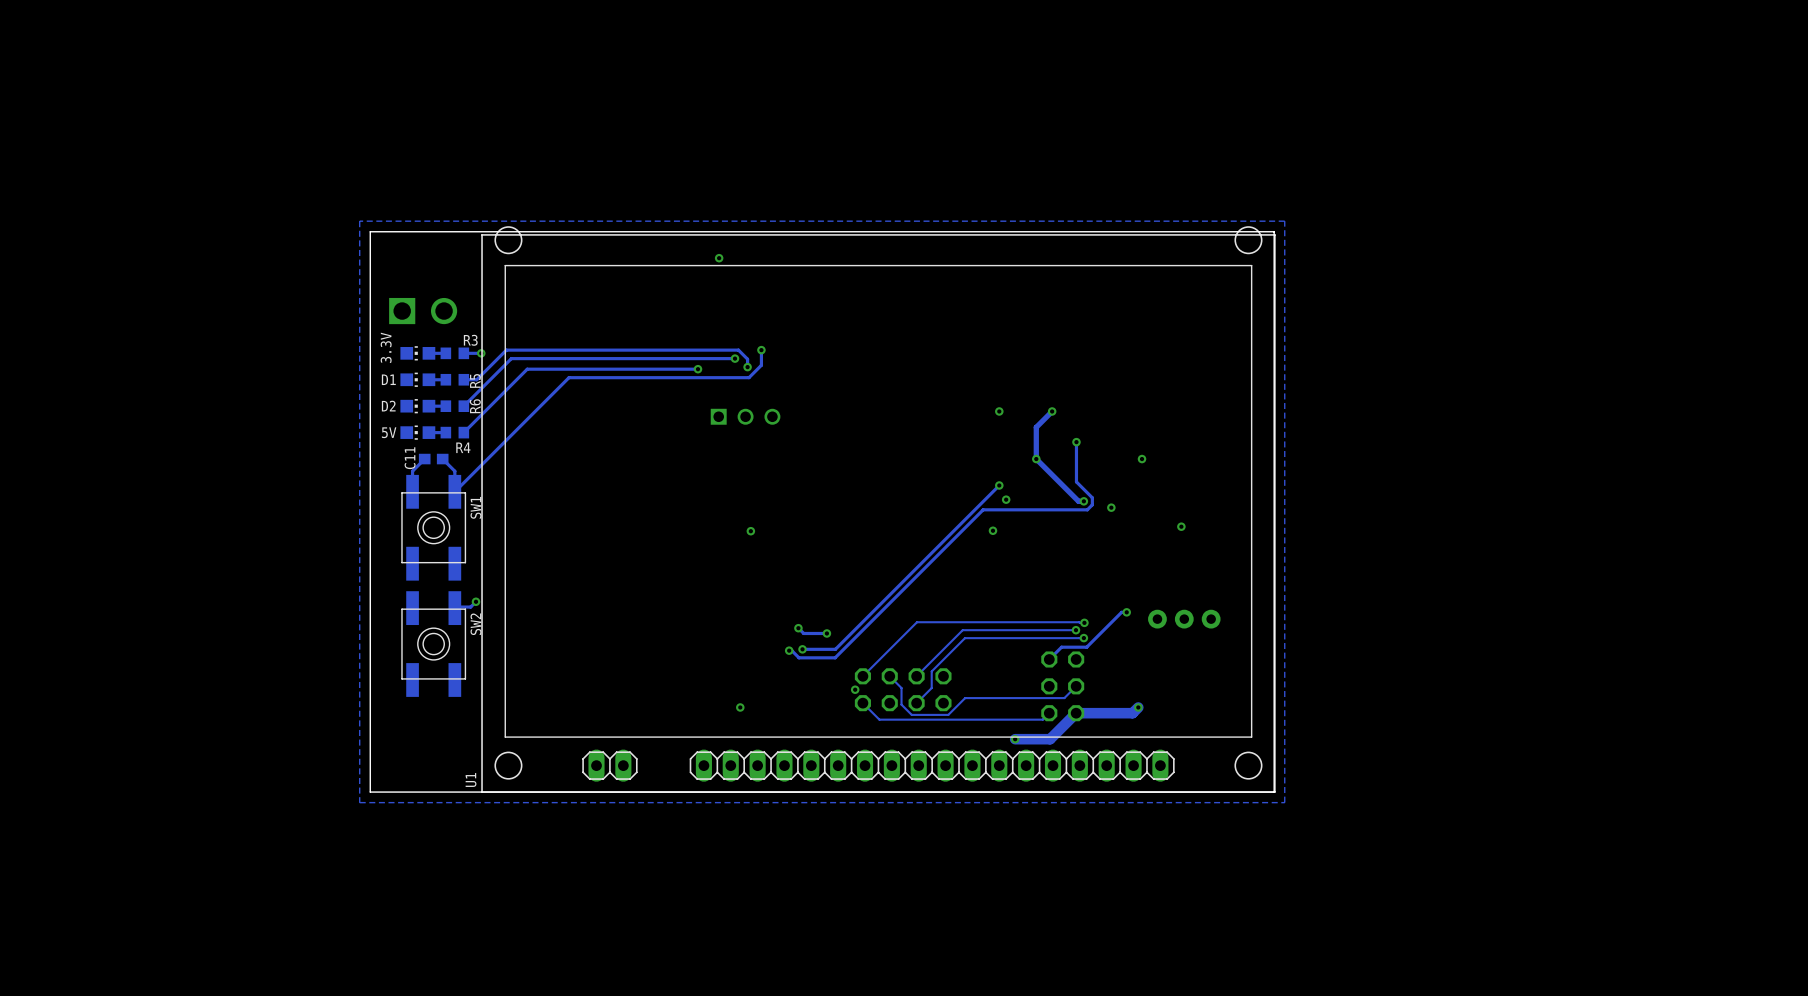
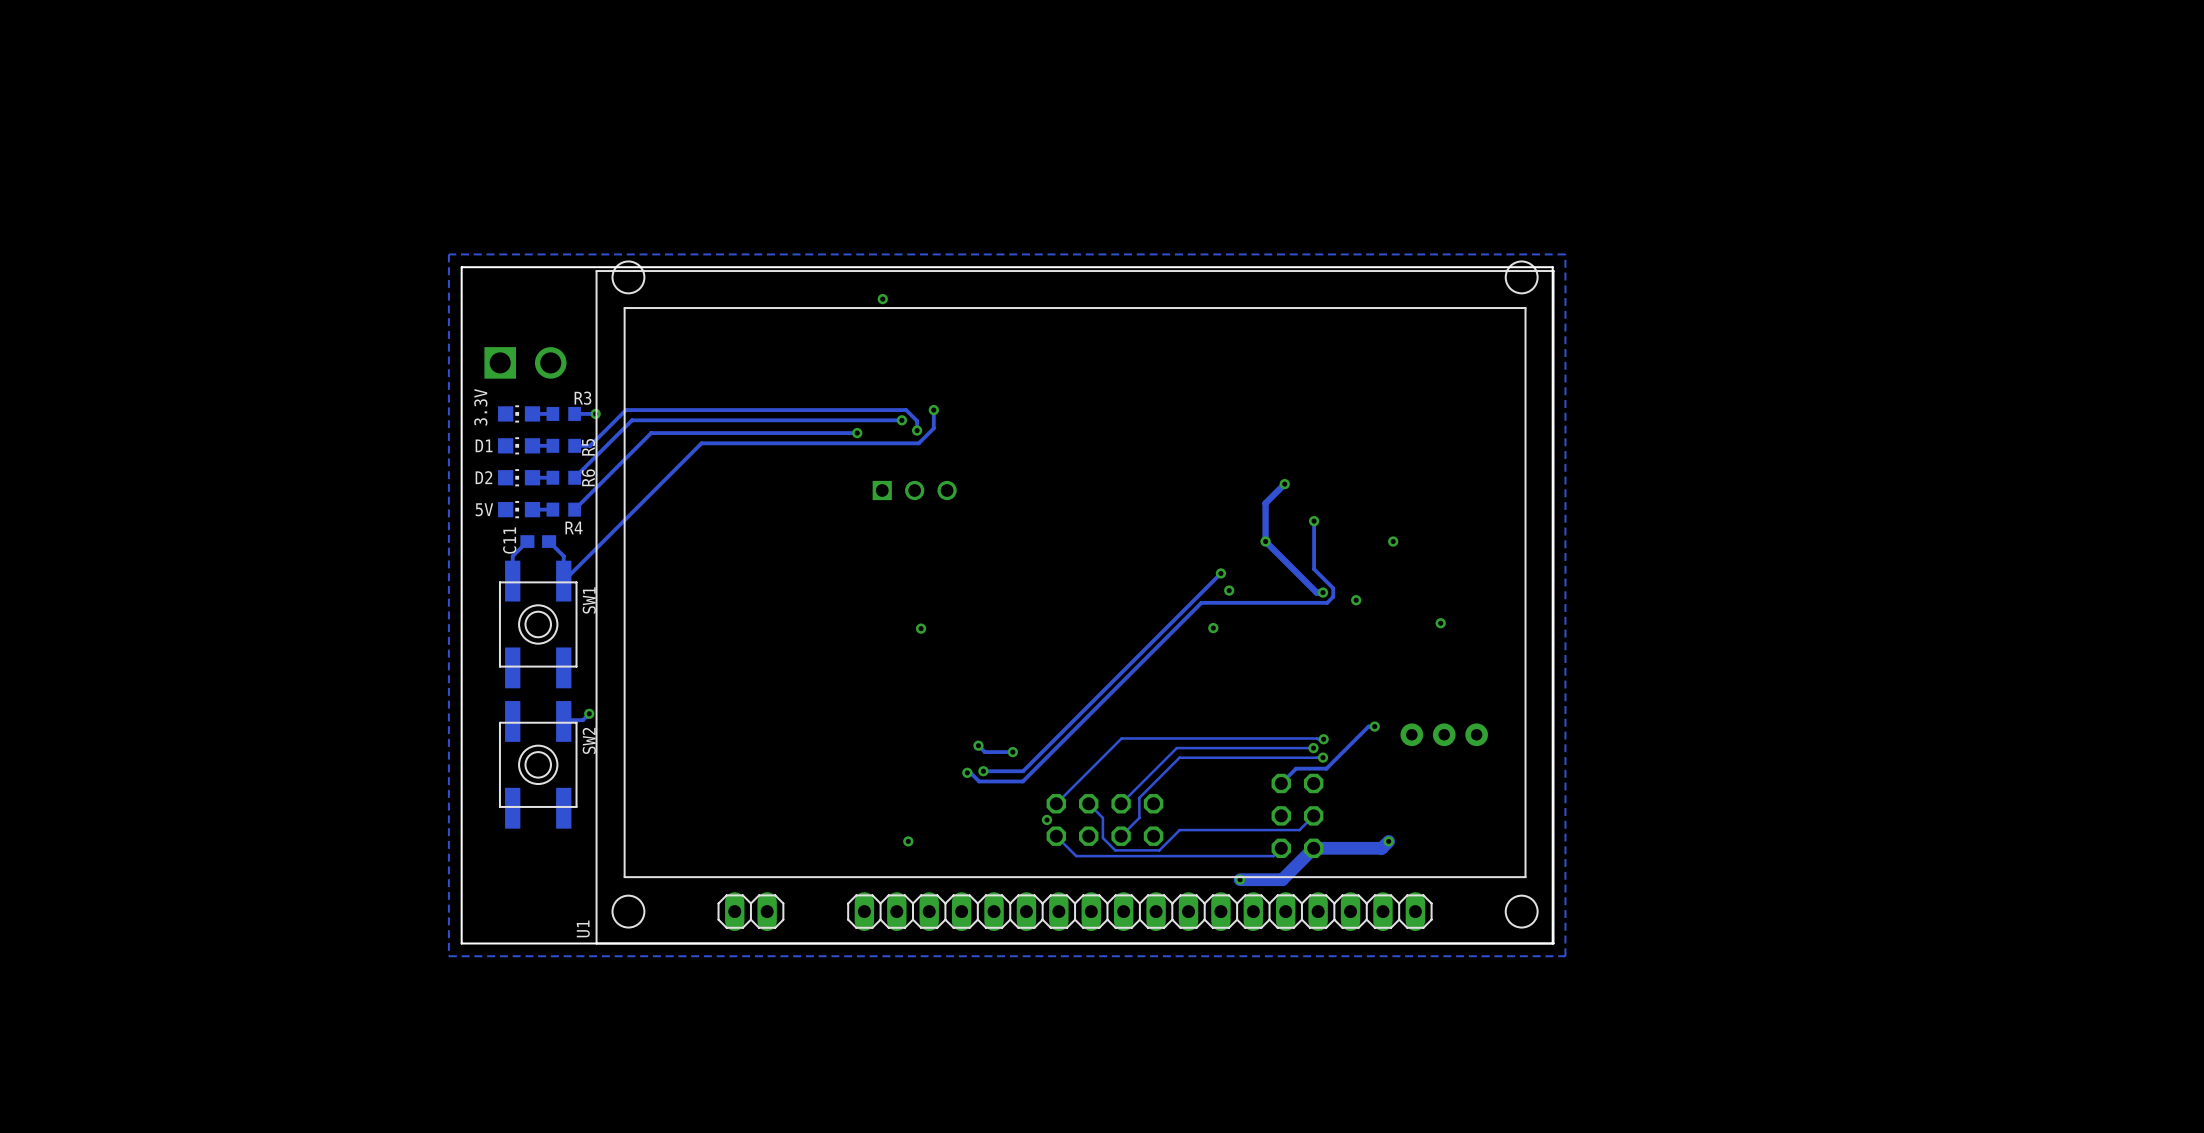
via: (999, 411) -> none

